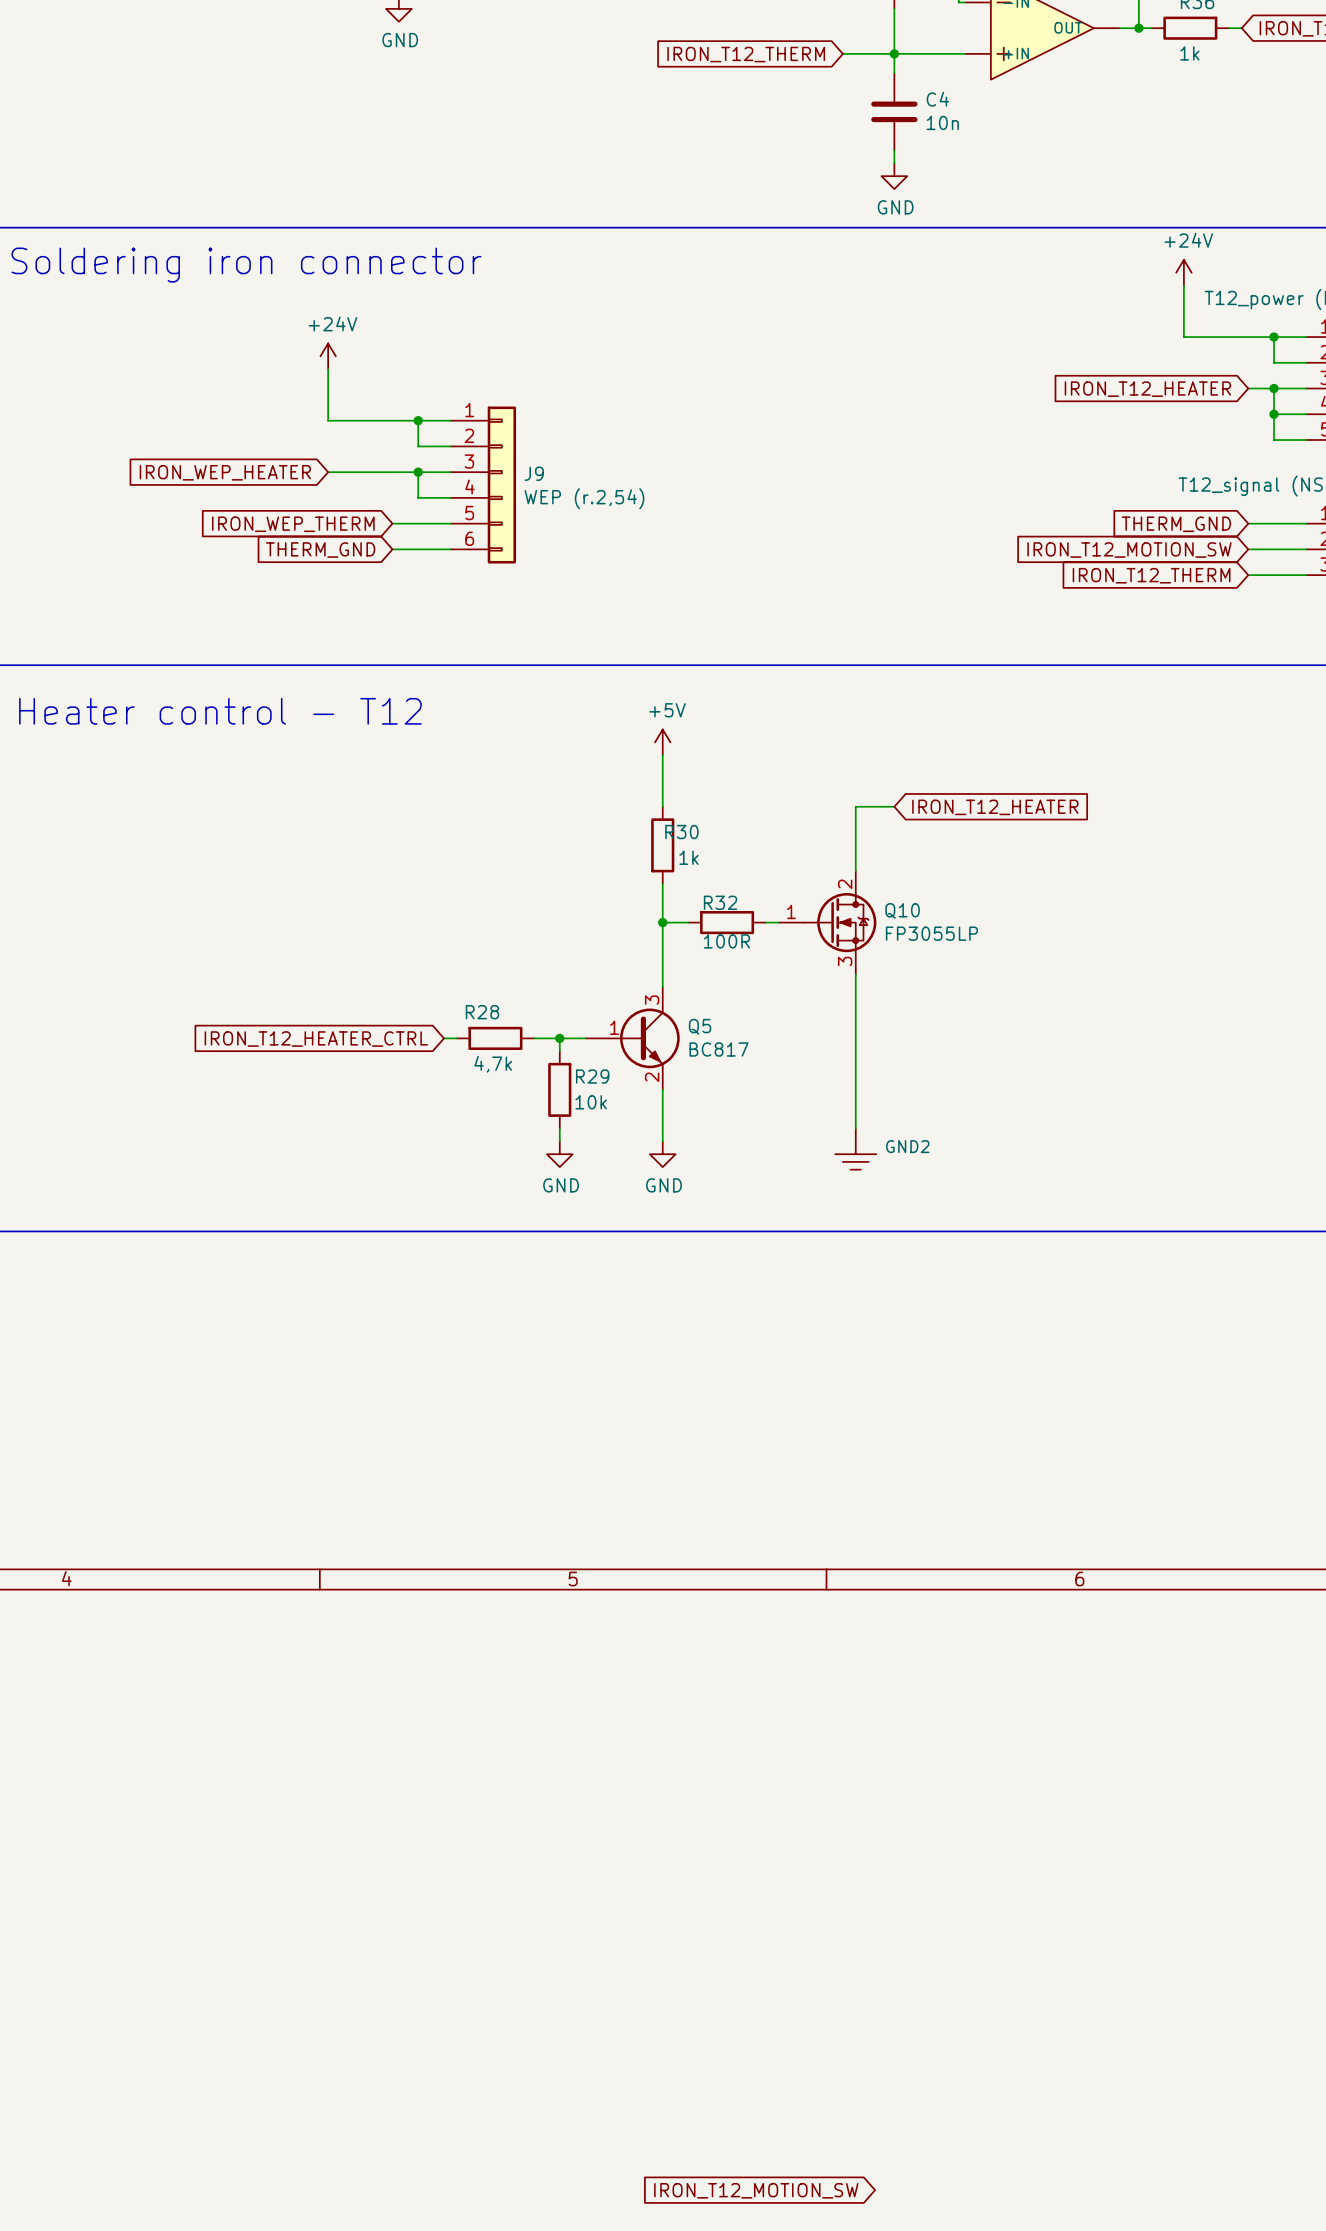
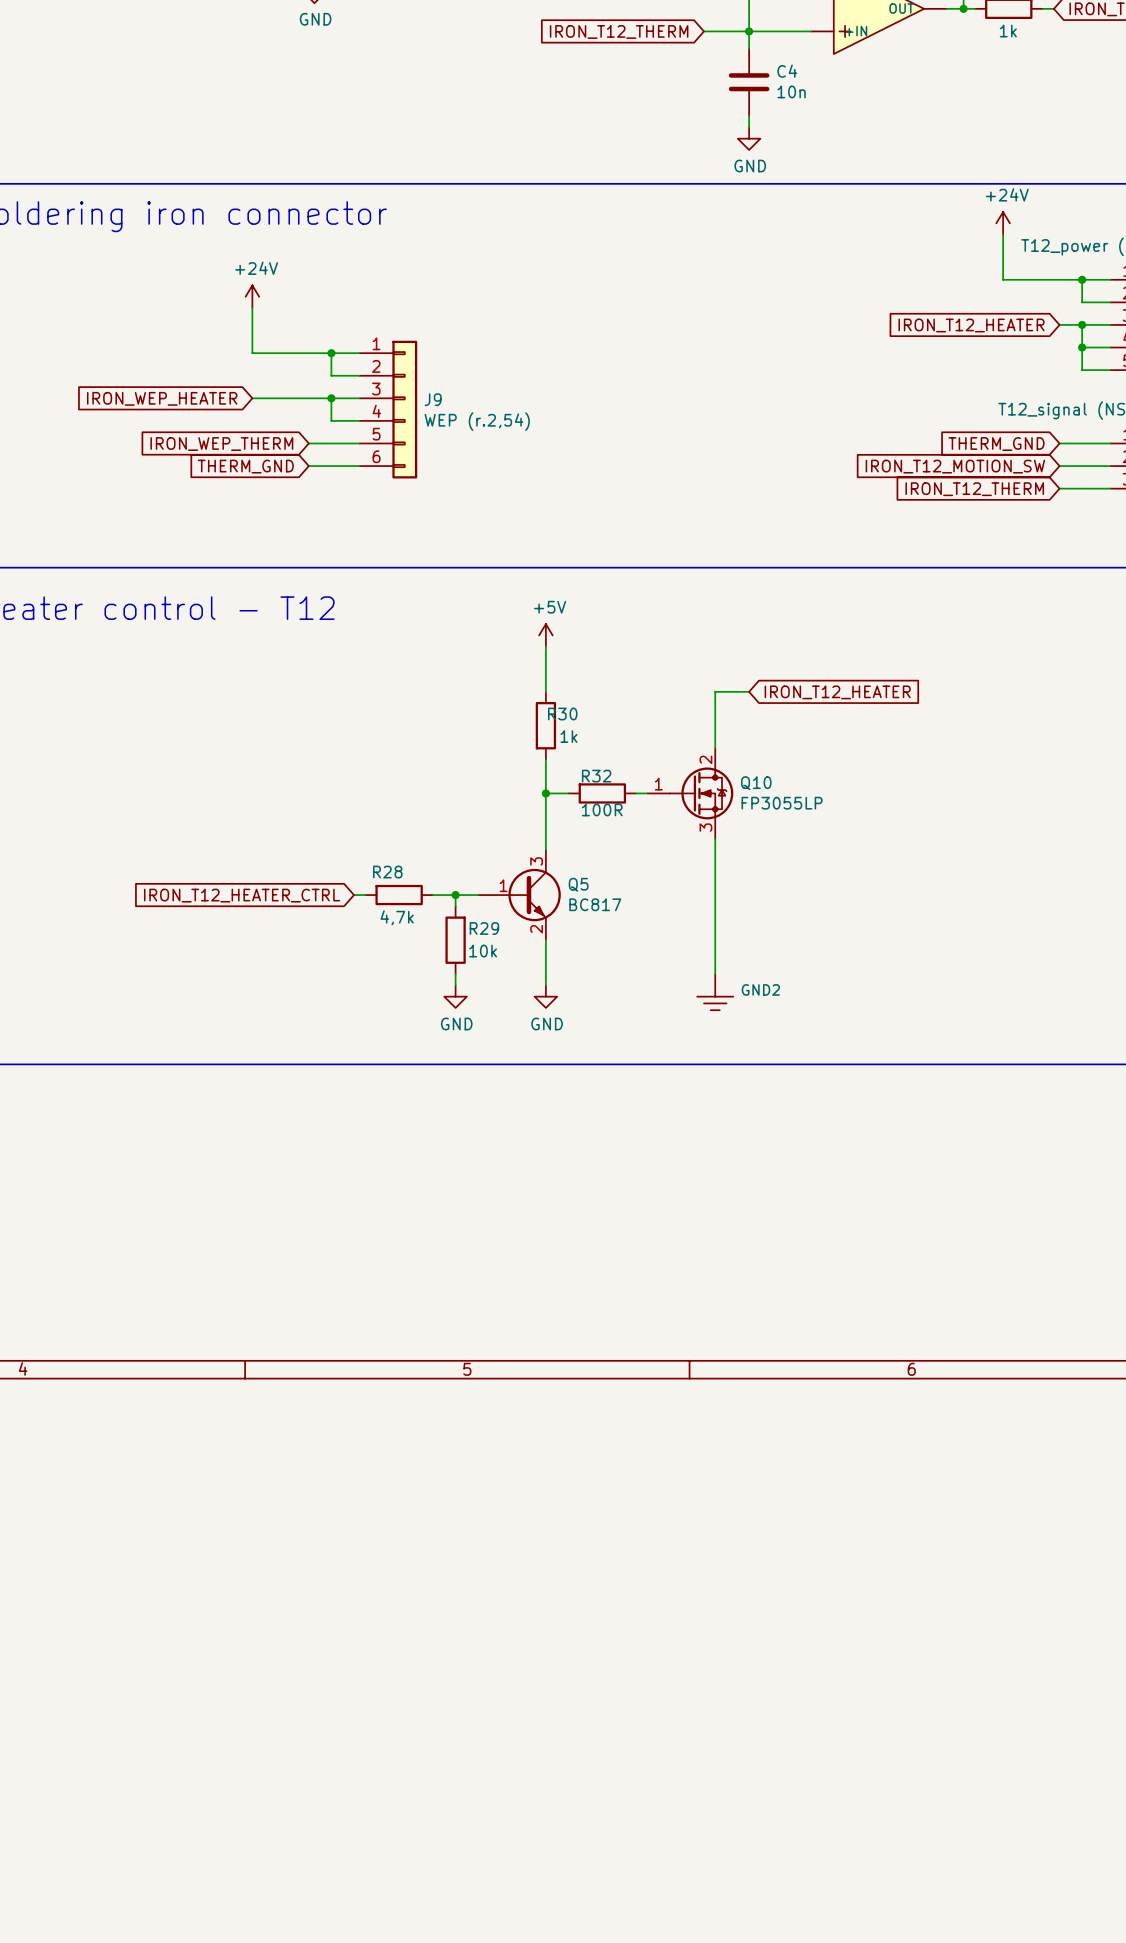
global label: IRON_T12_MOTION_SW (756, 2190) -> none

